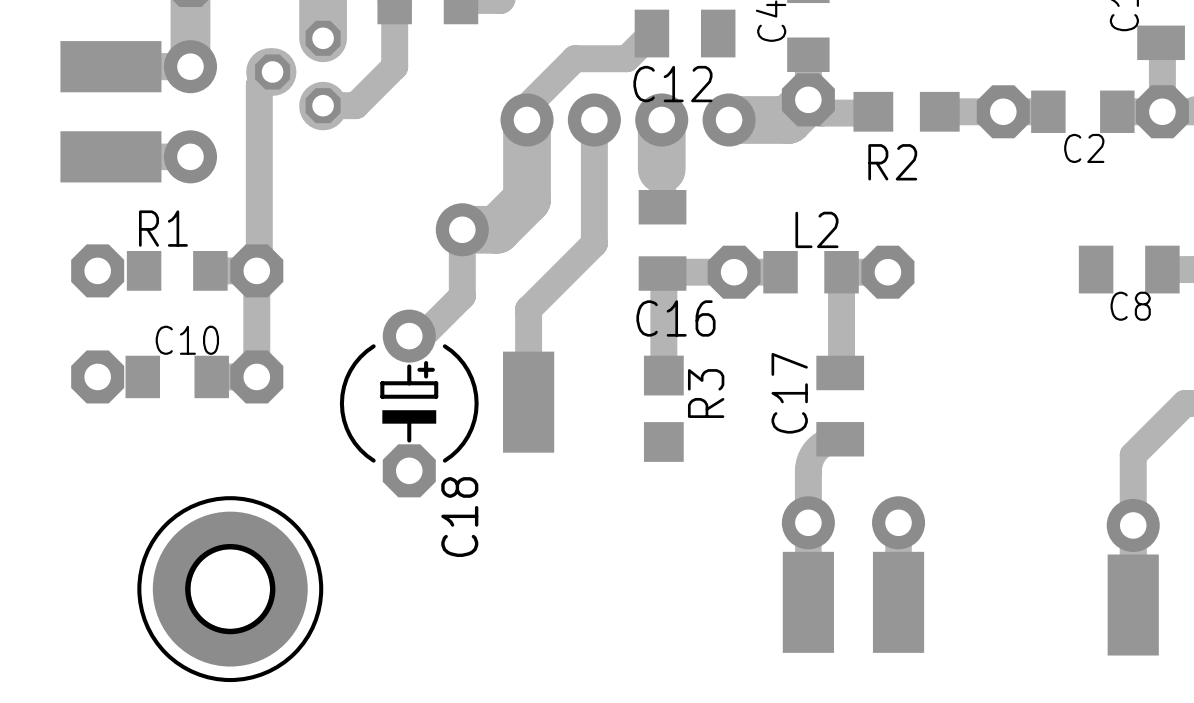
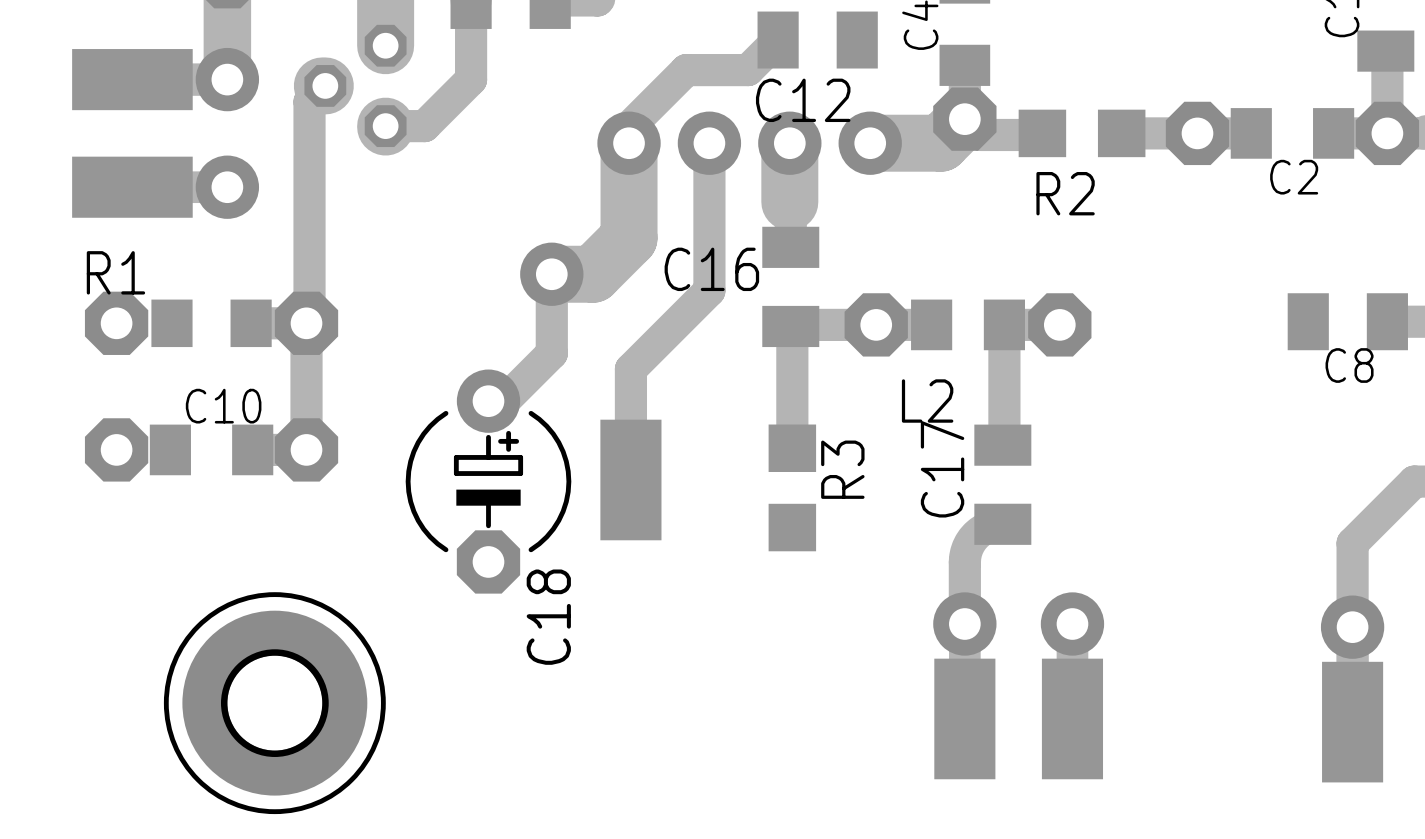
R1 name position: R1 (163, 228) -> R1 (115, 272)
L2 name position: L2 (816, 229) -> L2 (927, 401)
C16 name position: C16 (675, 318) -> C16 (711, 269)

